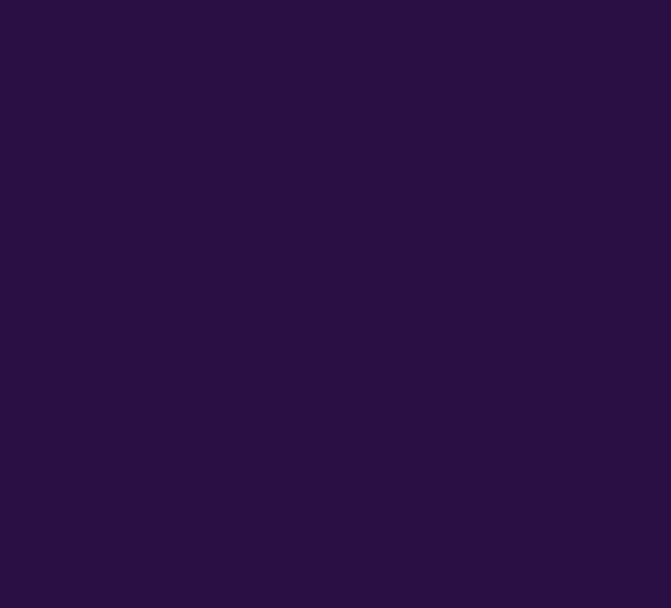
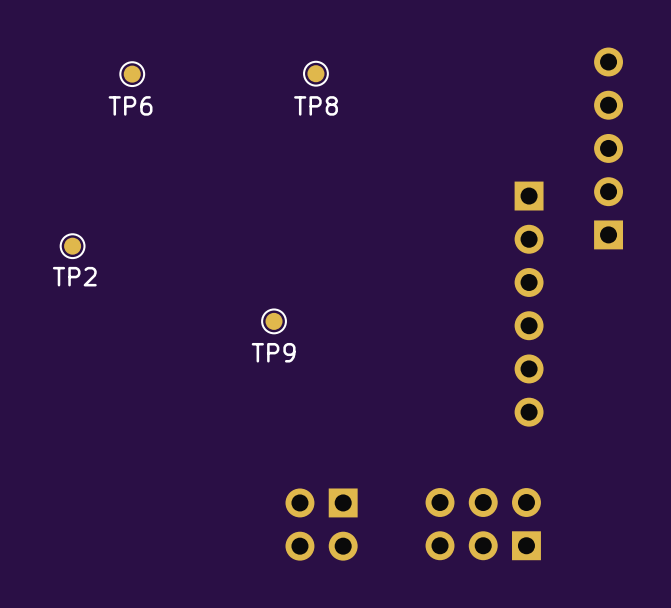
TP8: none -> (315, 73)
TP6: none -> (132, 74)
part: none -> (608, 148)
TP2: none -> (72, 246)
part: none -> (529, 304)
TP9: none -> (274, 321)
part: none -> (321, 524)
part: none -> (483, 524)

